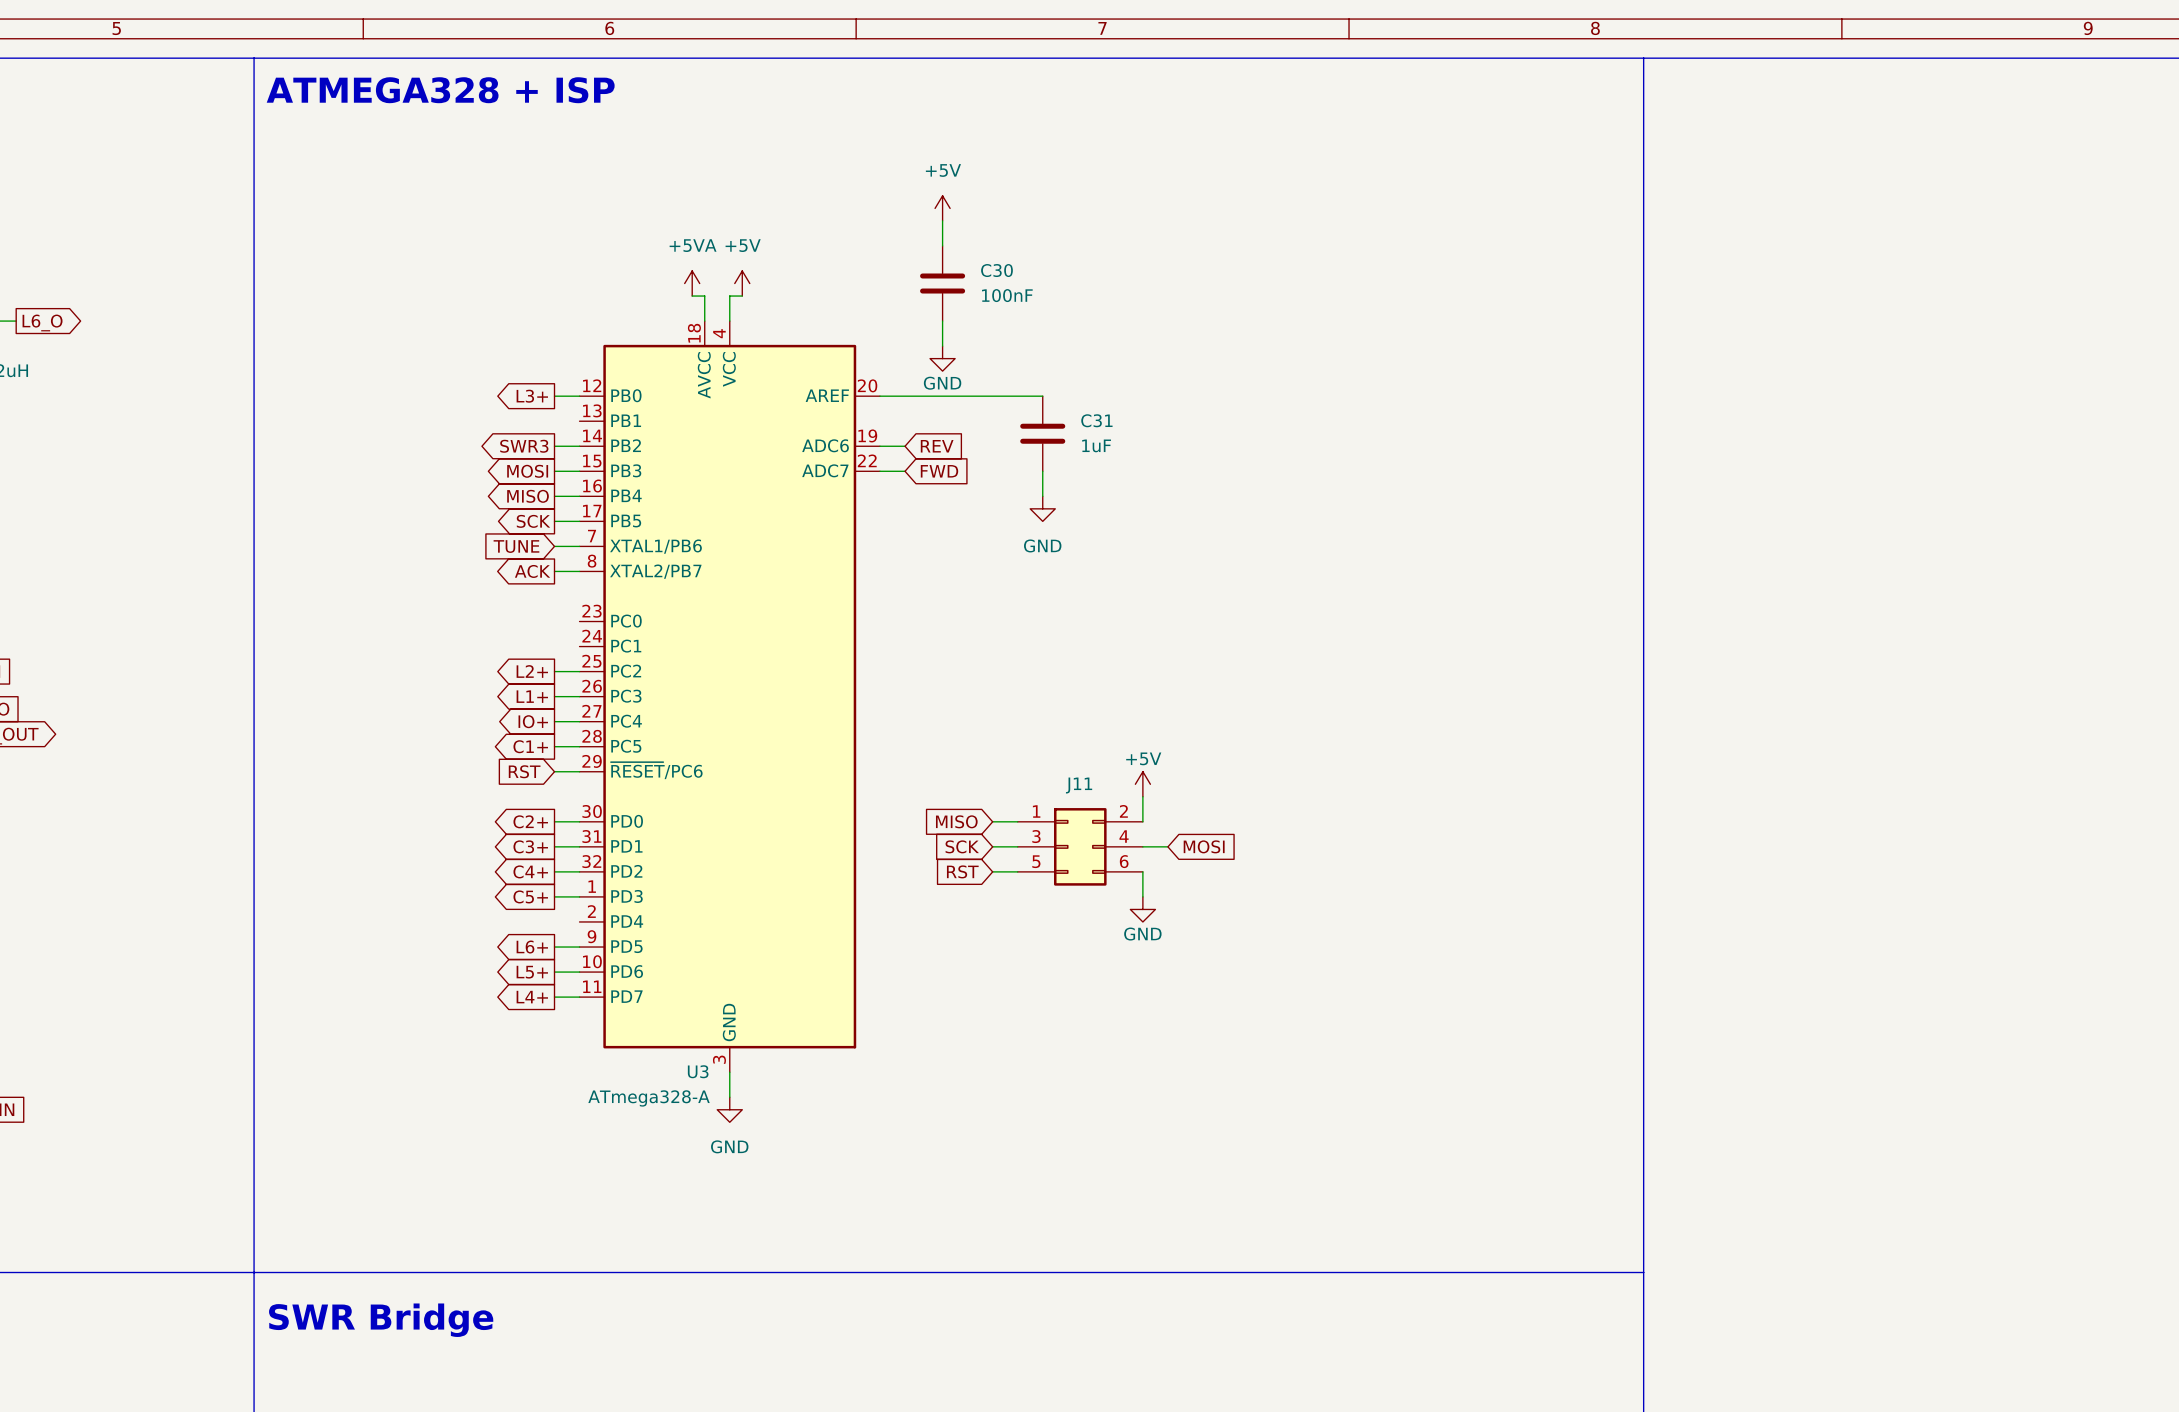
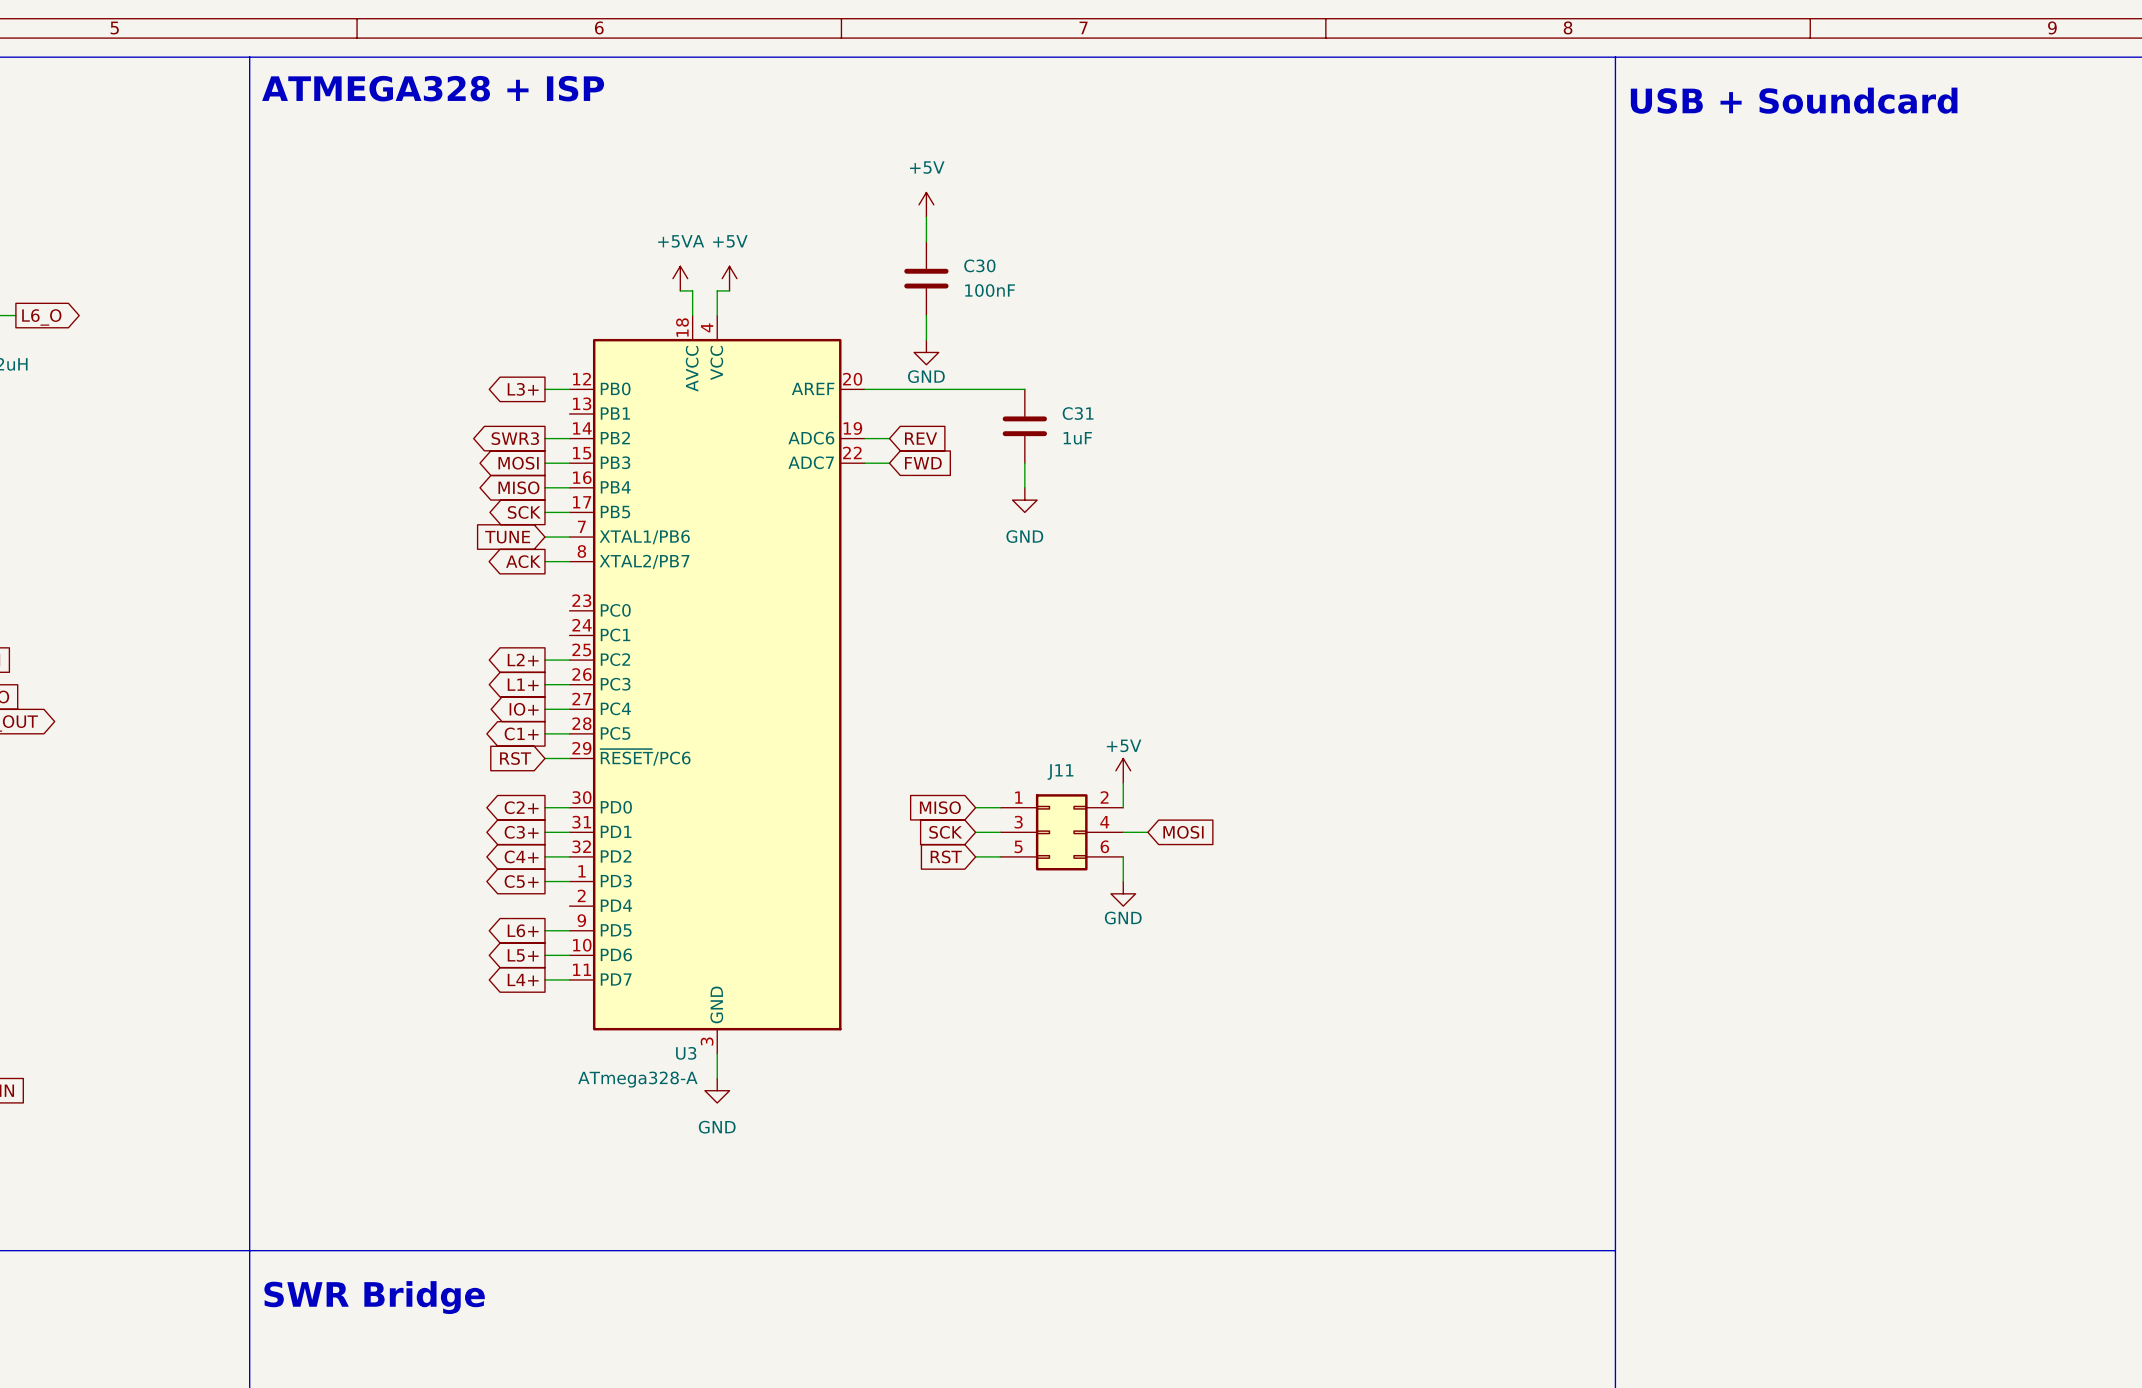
text: none -> USB + Soundcard (1794, 100)

